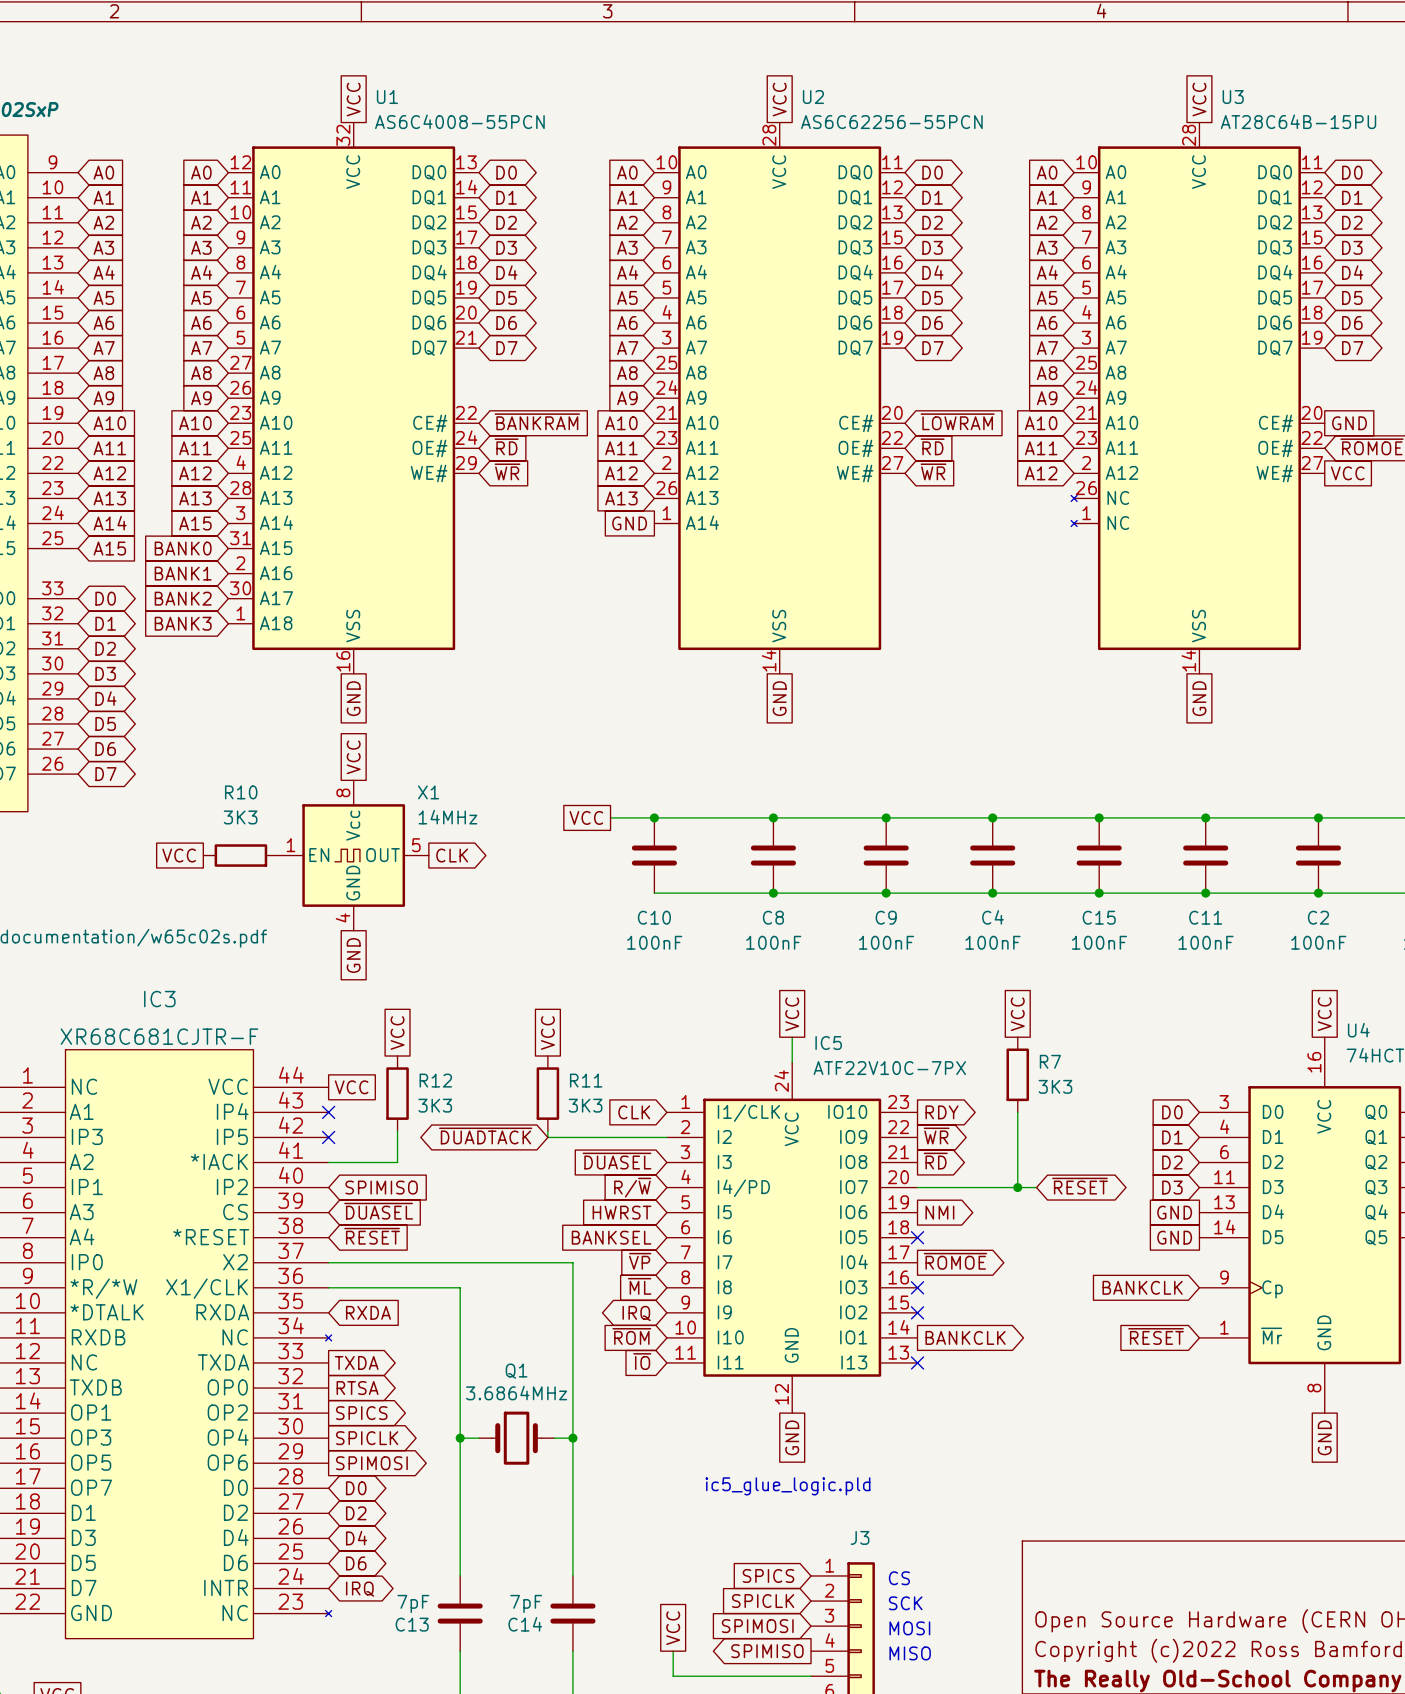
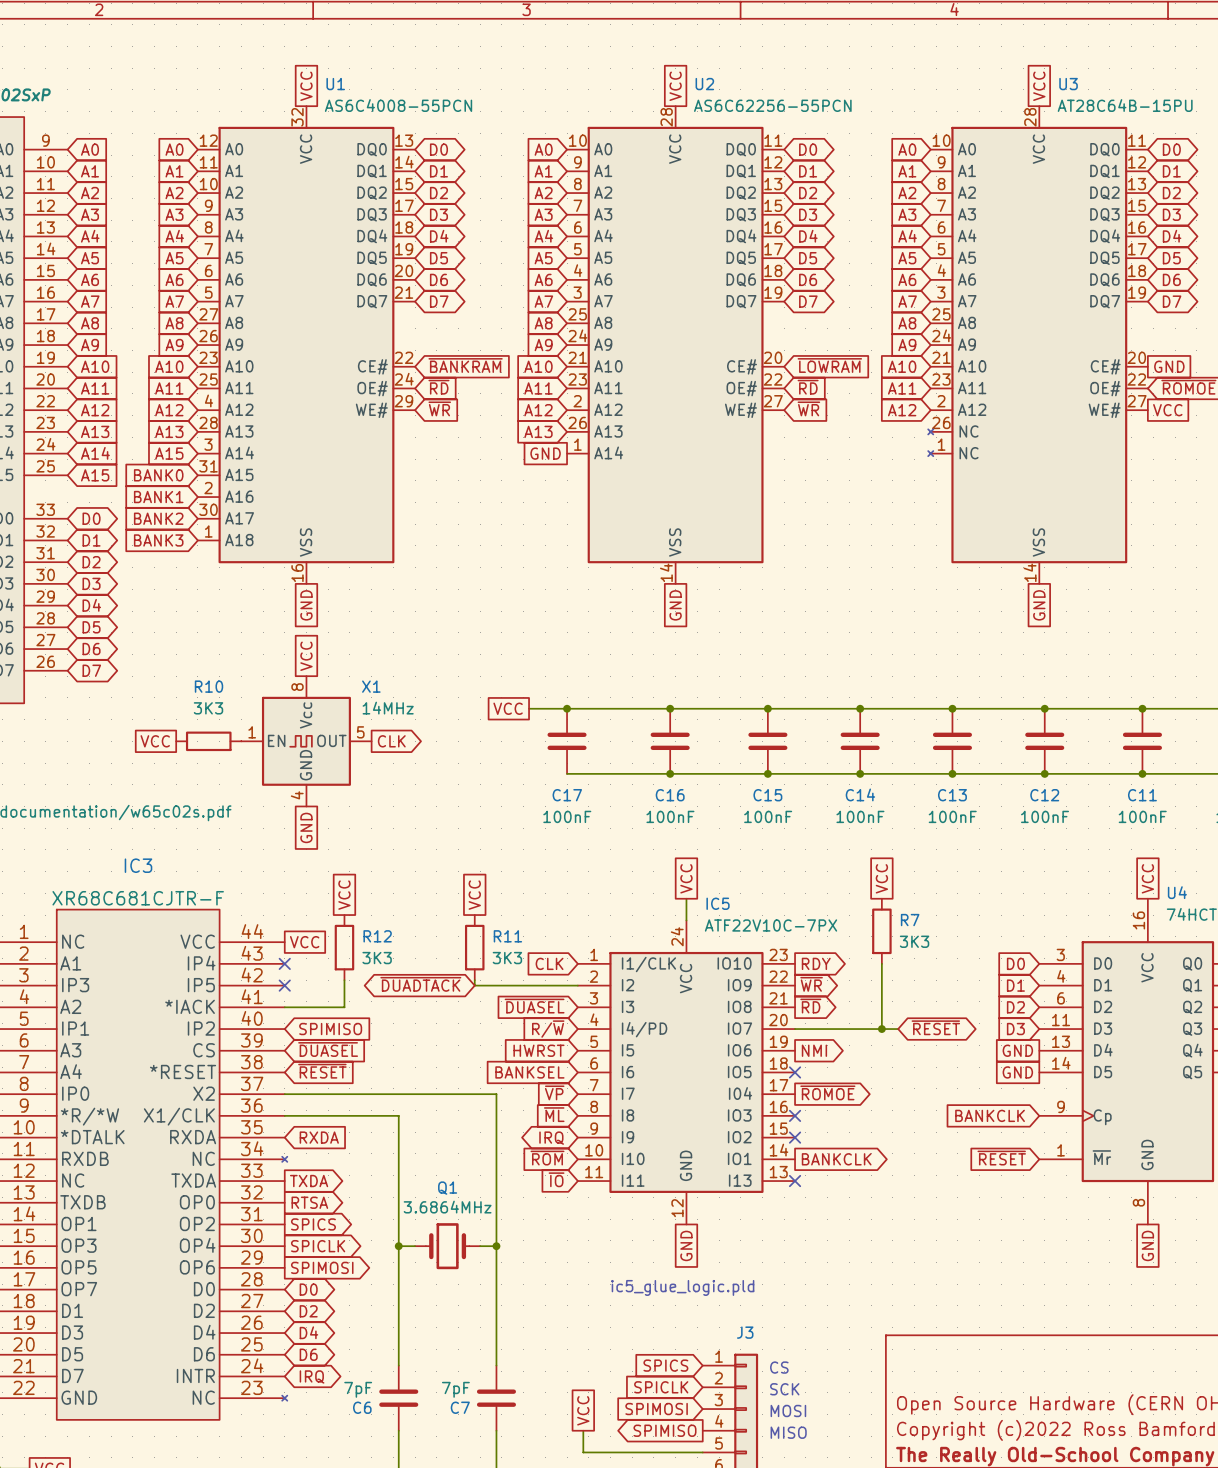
C10 name: C10 (654, 917) -> C17 (567, 795)
C8 name: C8 (773, 917) -> C16 (670, 795)
C9 name: C9 (886, 917) -> C15 (767, 795)
C4 name: C4 (992, 917) -> C14 (860, 794)
C15 name: C15 (1099, 917) -> C13 (952, 795)
C11 name: C11 (1205, 917) -> C12 (1044, 795)
C2 name: C2 (1318, 917) -> C11 (1142, 795)
C13 name: C13 (412, 1624) -> C6 (362, 1407)
C14 name: C14 (525, 1624) -> C7 (460, 1407)

